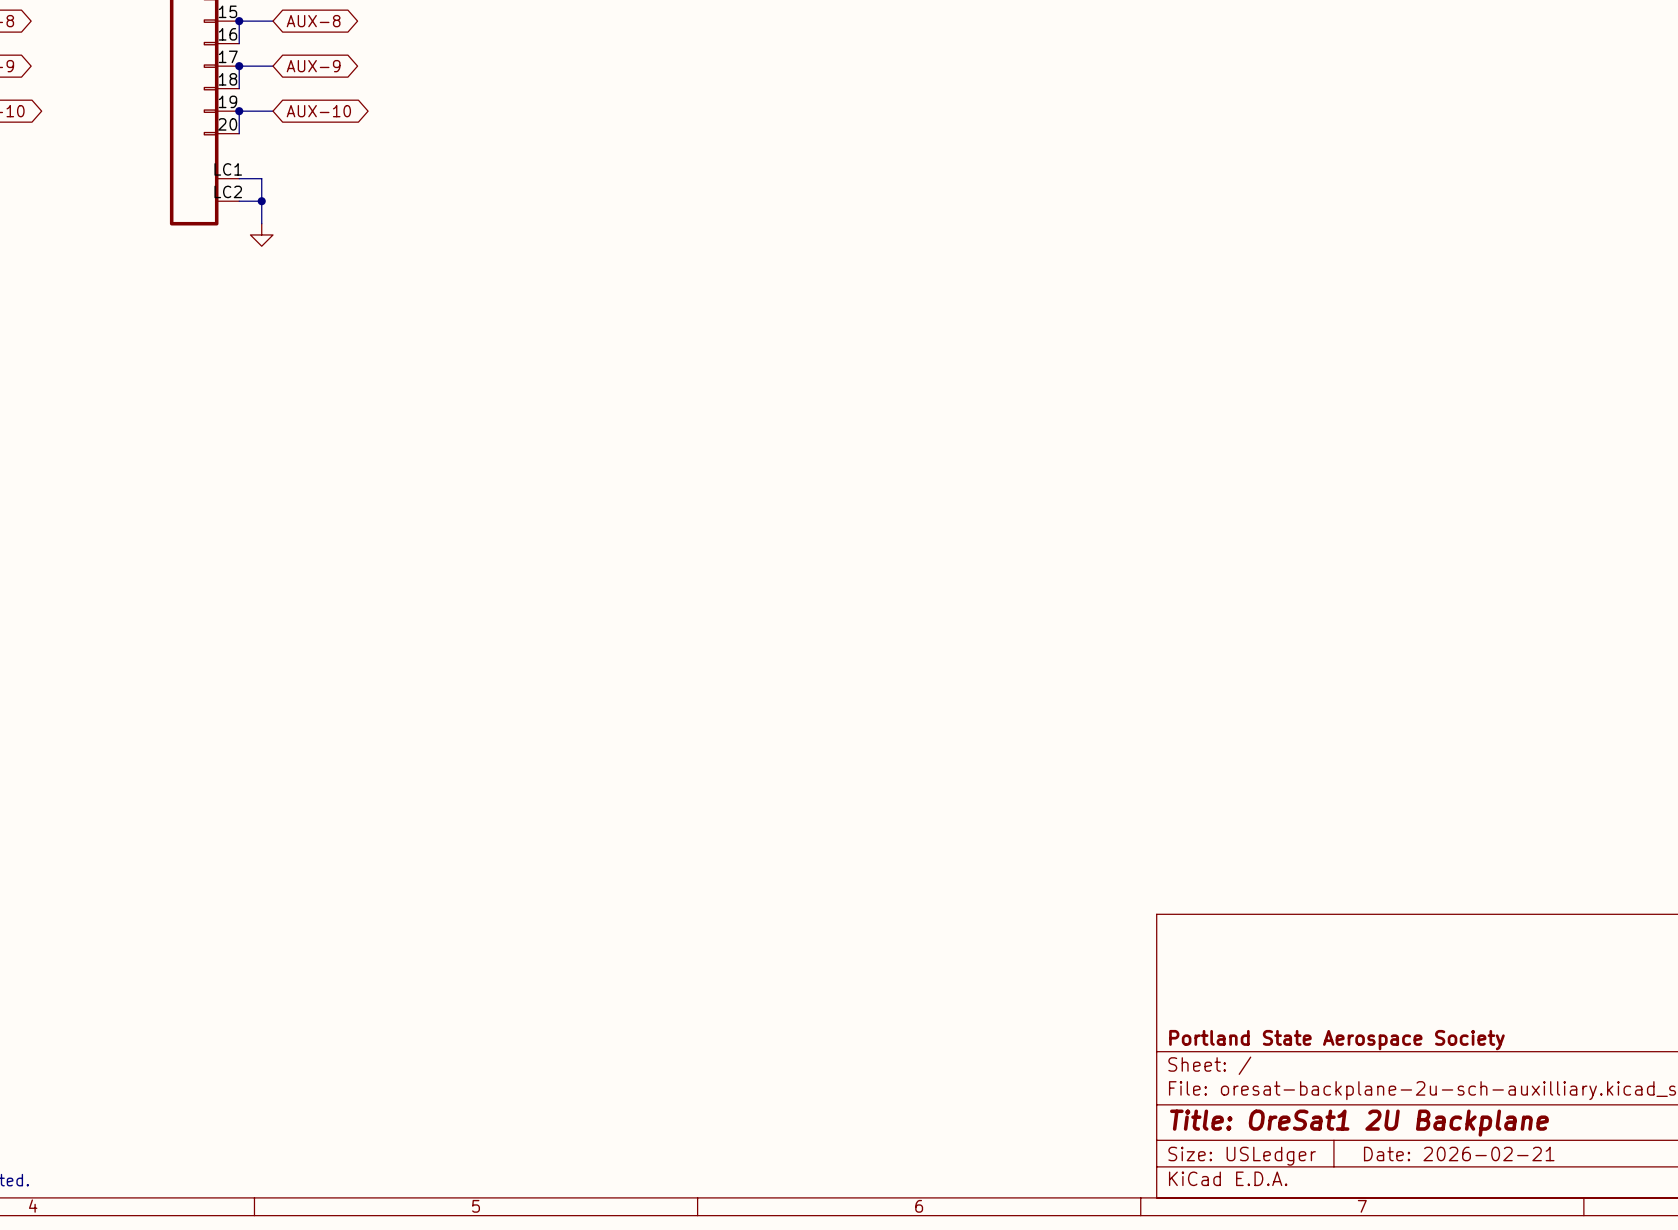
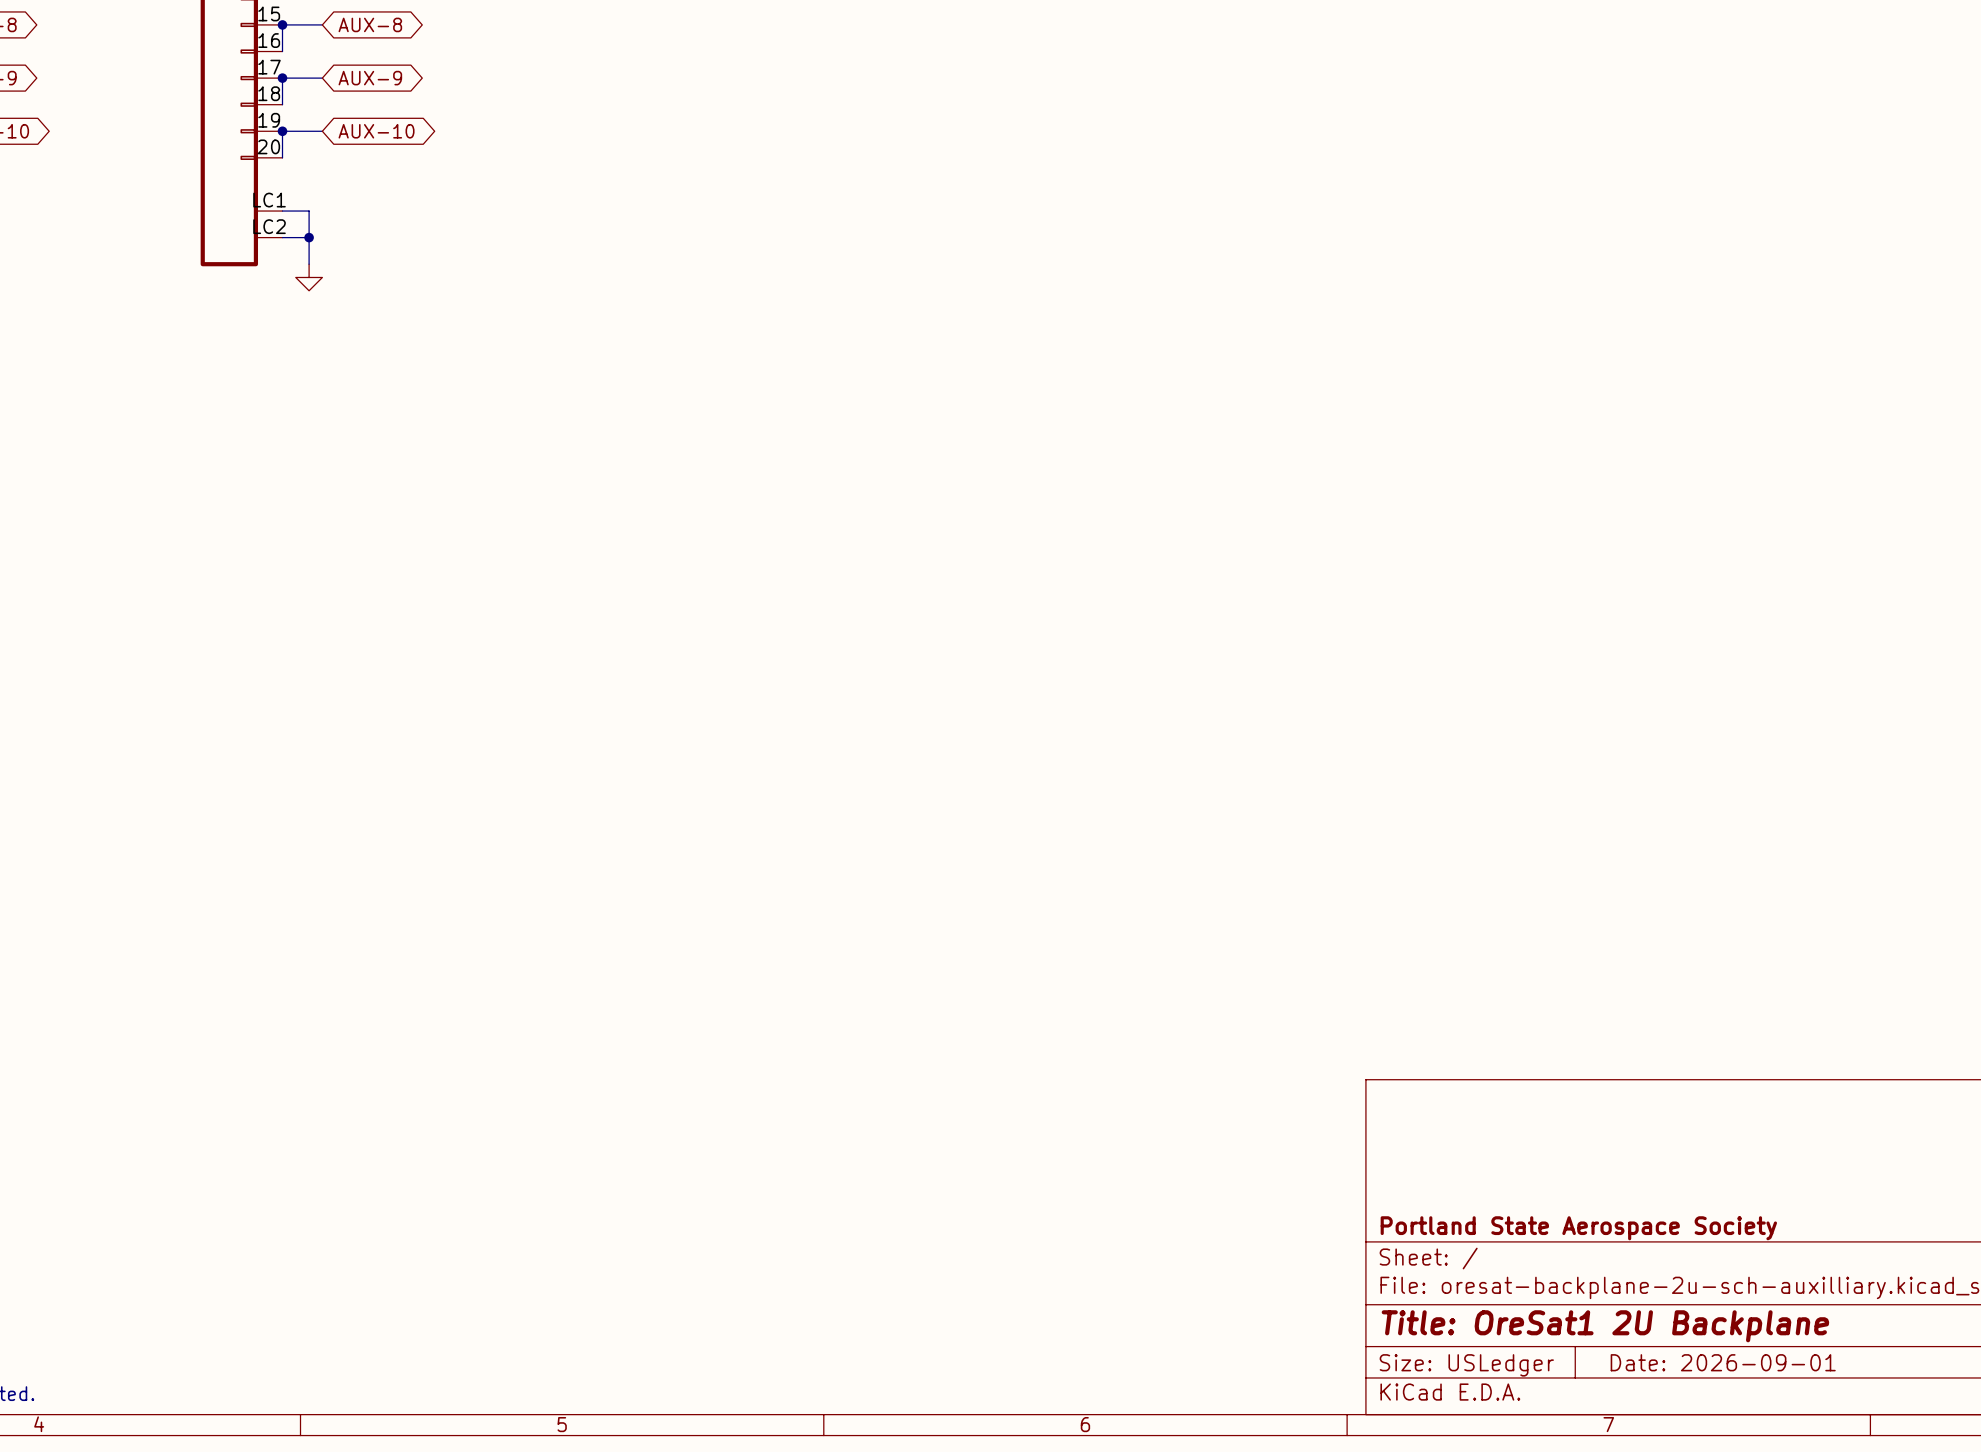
title block: Date: 2026-02-21 (1459, 1153) -> Date: 2026-09-01 (1723, 1362)

